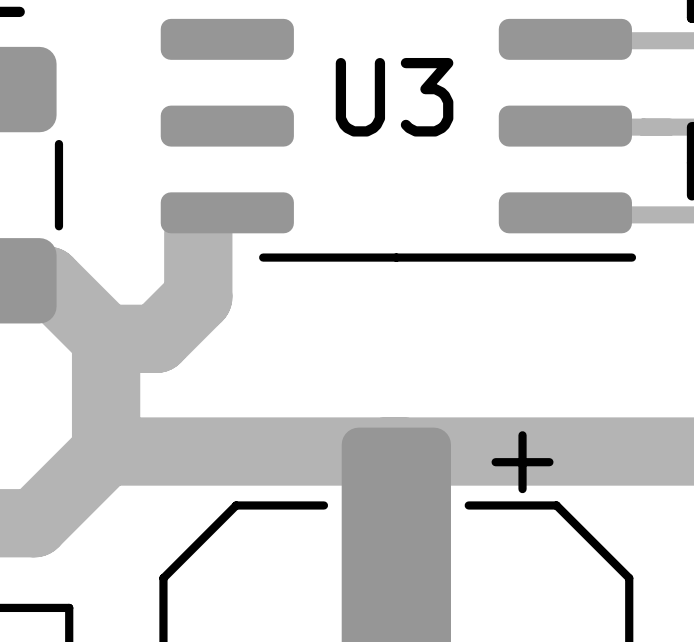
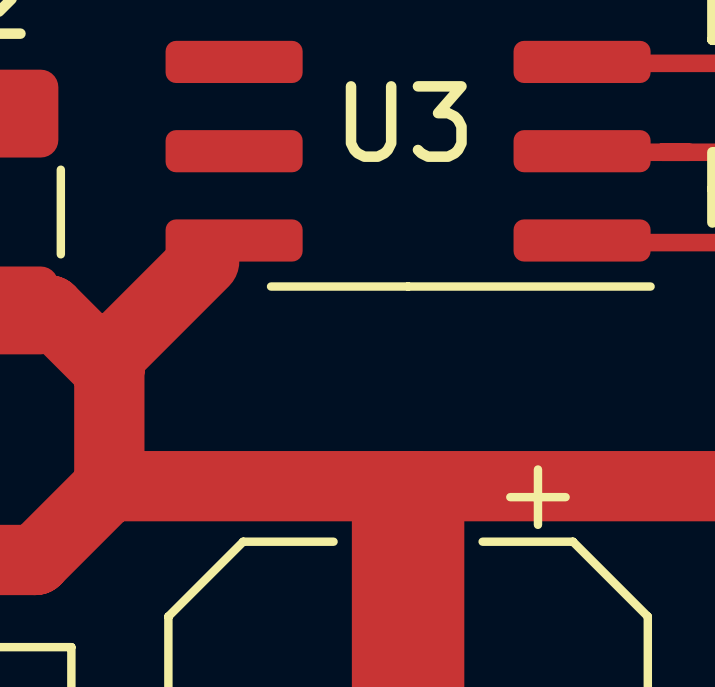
track: (198, 232) (198, 296) (156, 338) (106, 338) -> (204, 261) (109, 356) (109, 370)

